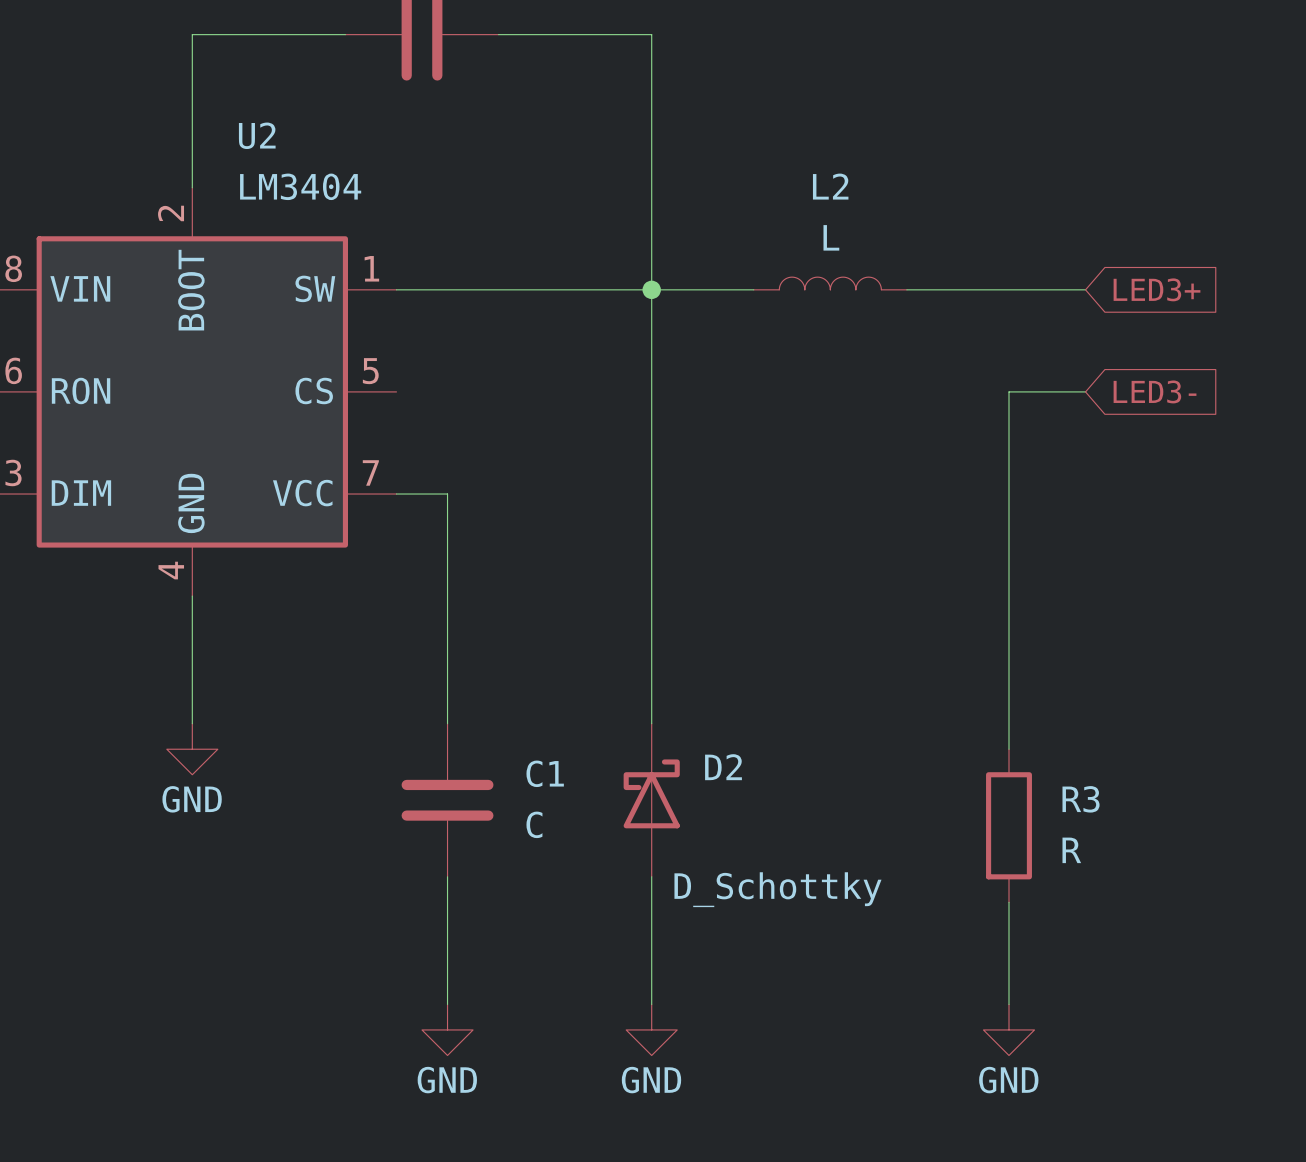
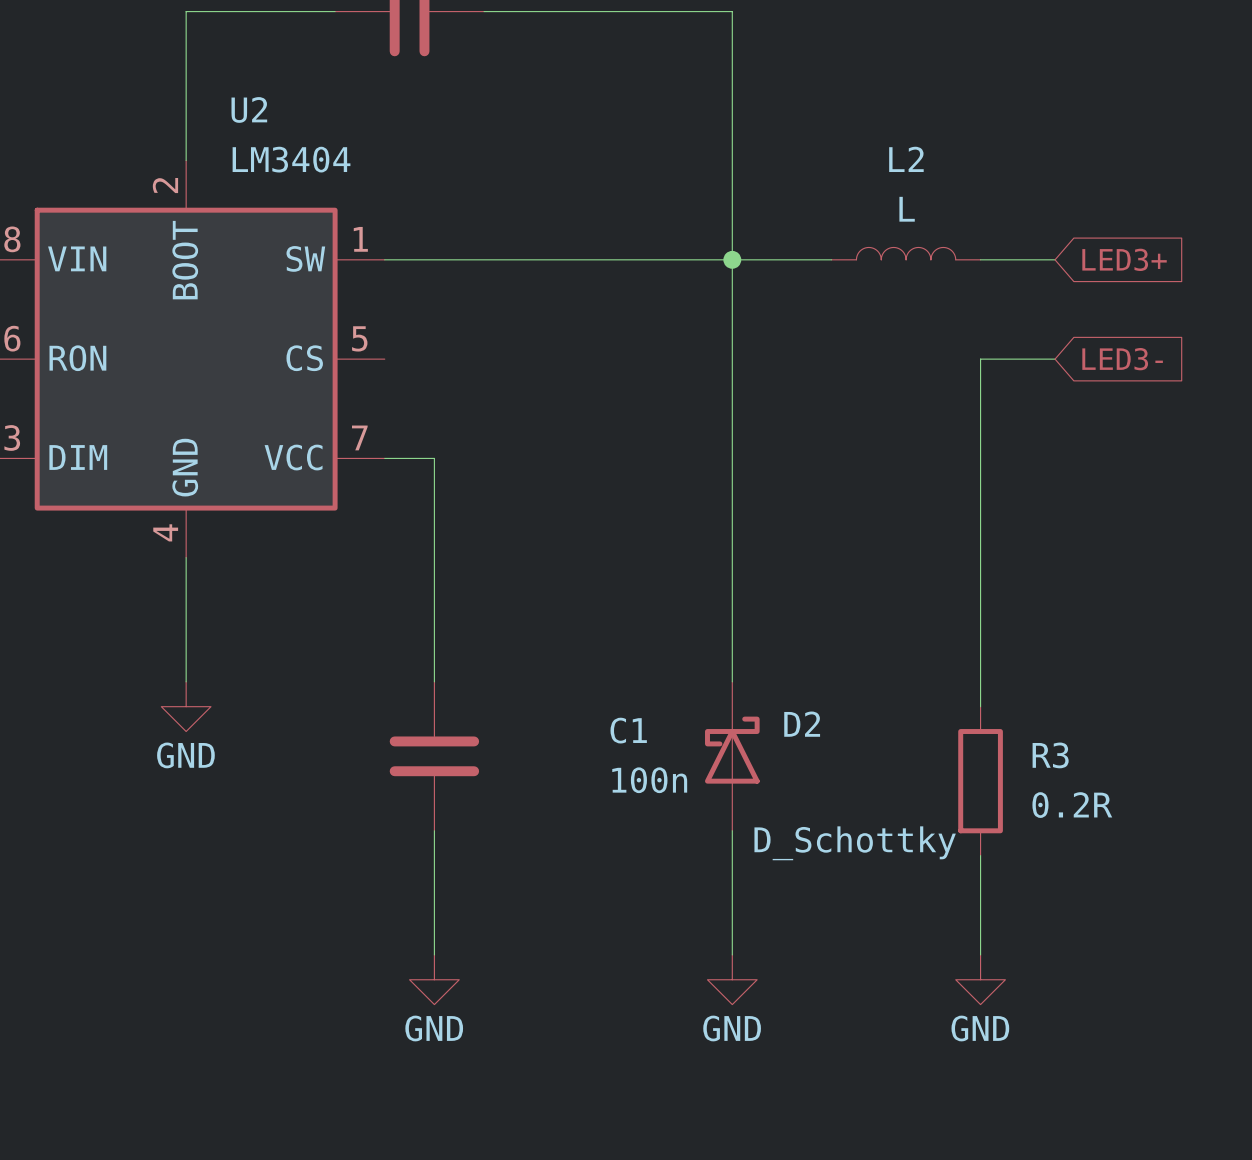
wire: (651, 34) (651, 723) -> (633, 11) (732, 11) (732, 681)
L2 position: (830, 283) -> (906, 253)
junction position: (651, 289) -> (732, 259)
wire: (906, 289) (1009, 289) -> (732, 259) (831, 259)
C1 name position: C1 (545, 773) -> C1 (628, 730)
D2 position: (651, 800) -> (732, 756)
C1 value: C (534, 824) -> 100n (649, 780)
R3 value: R (1071, 850) -> 0.2R (1072, 805)
wire: (651, 876) (651, 1004) -> (732, 830) (732, 954)
power symbol position: GND (651, 1029) -> GND (732, 979)

